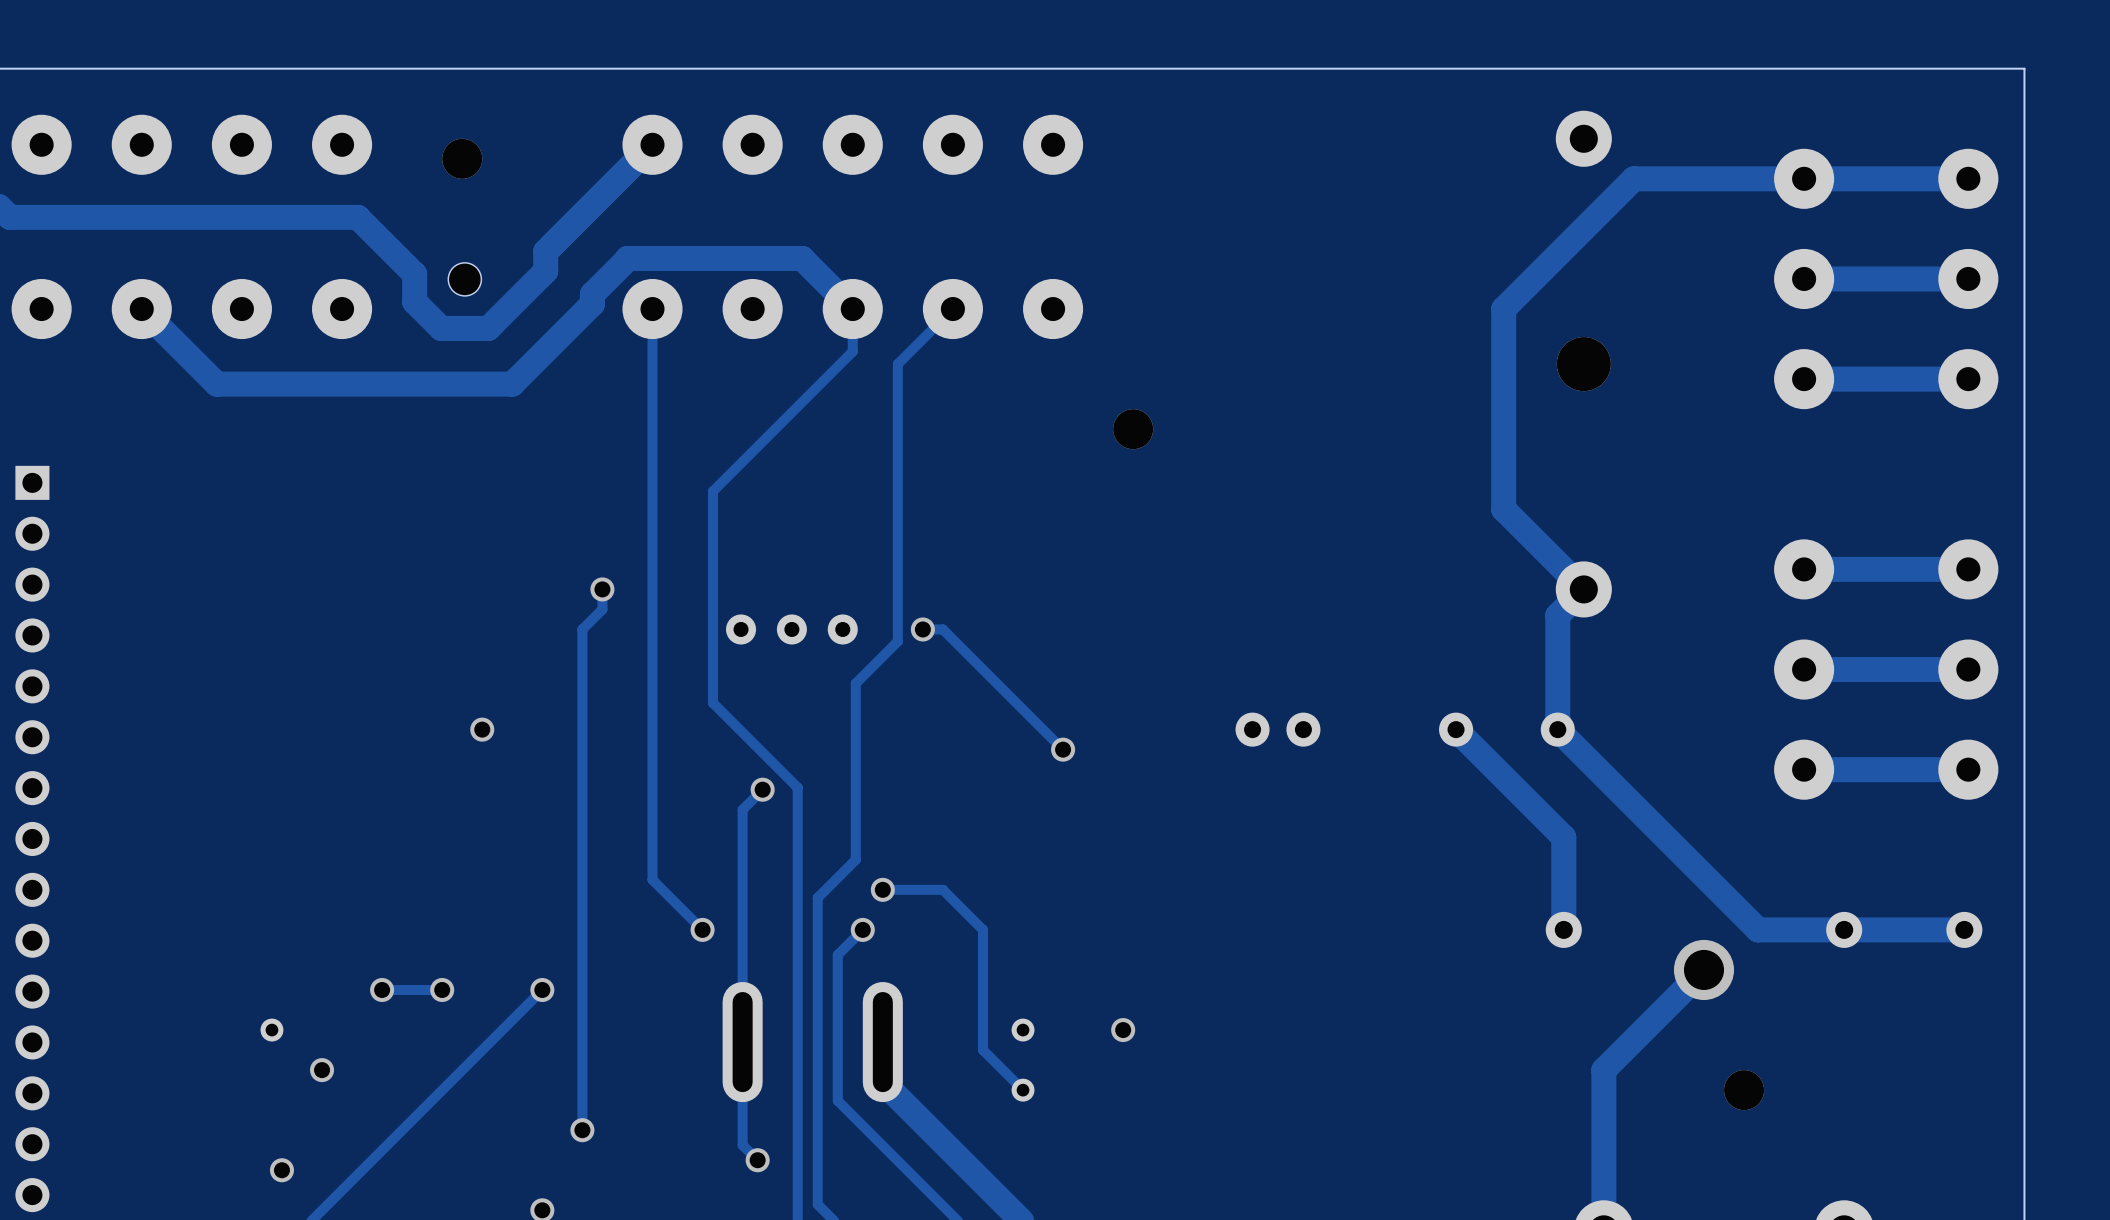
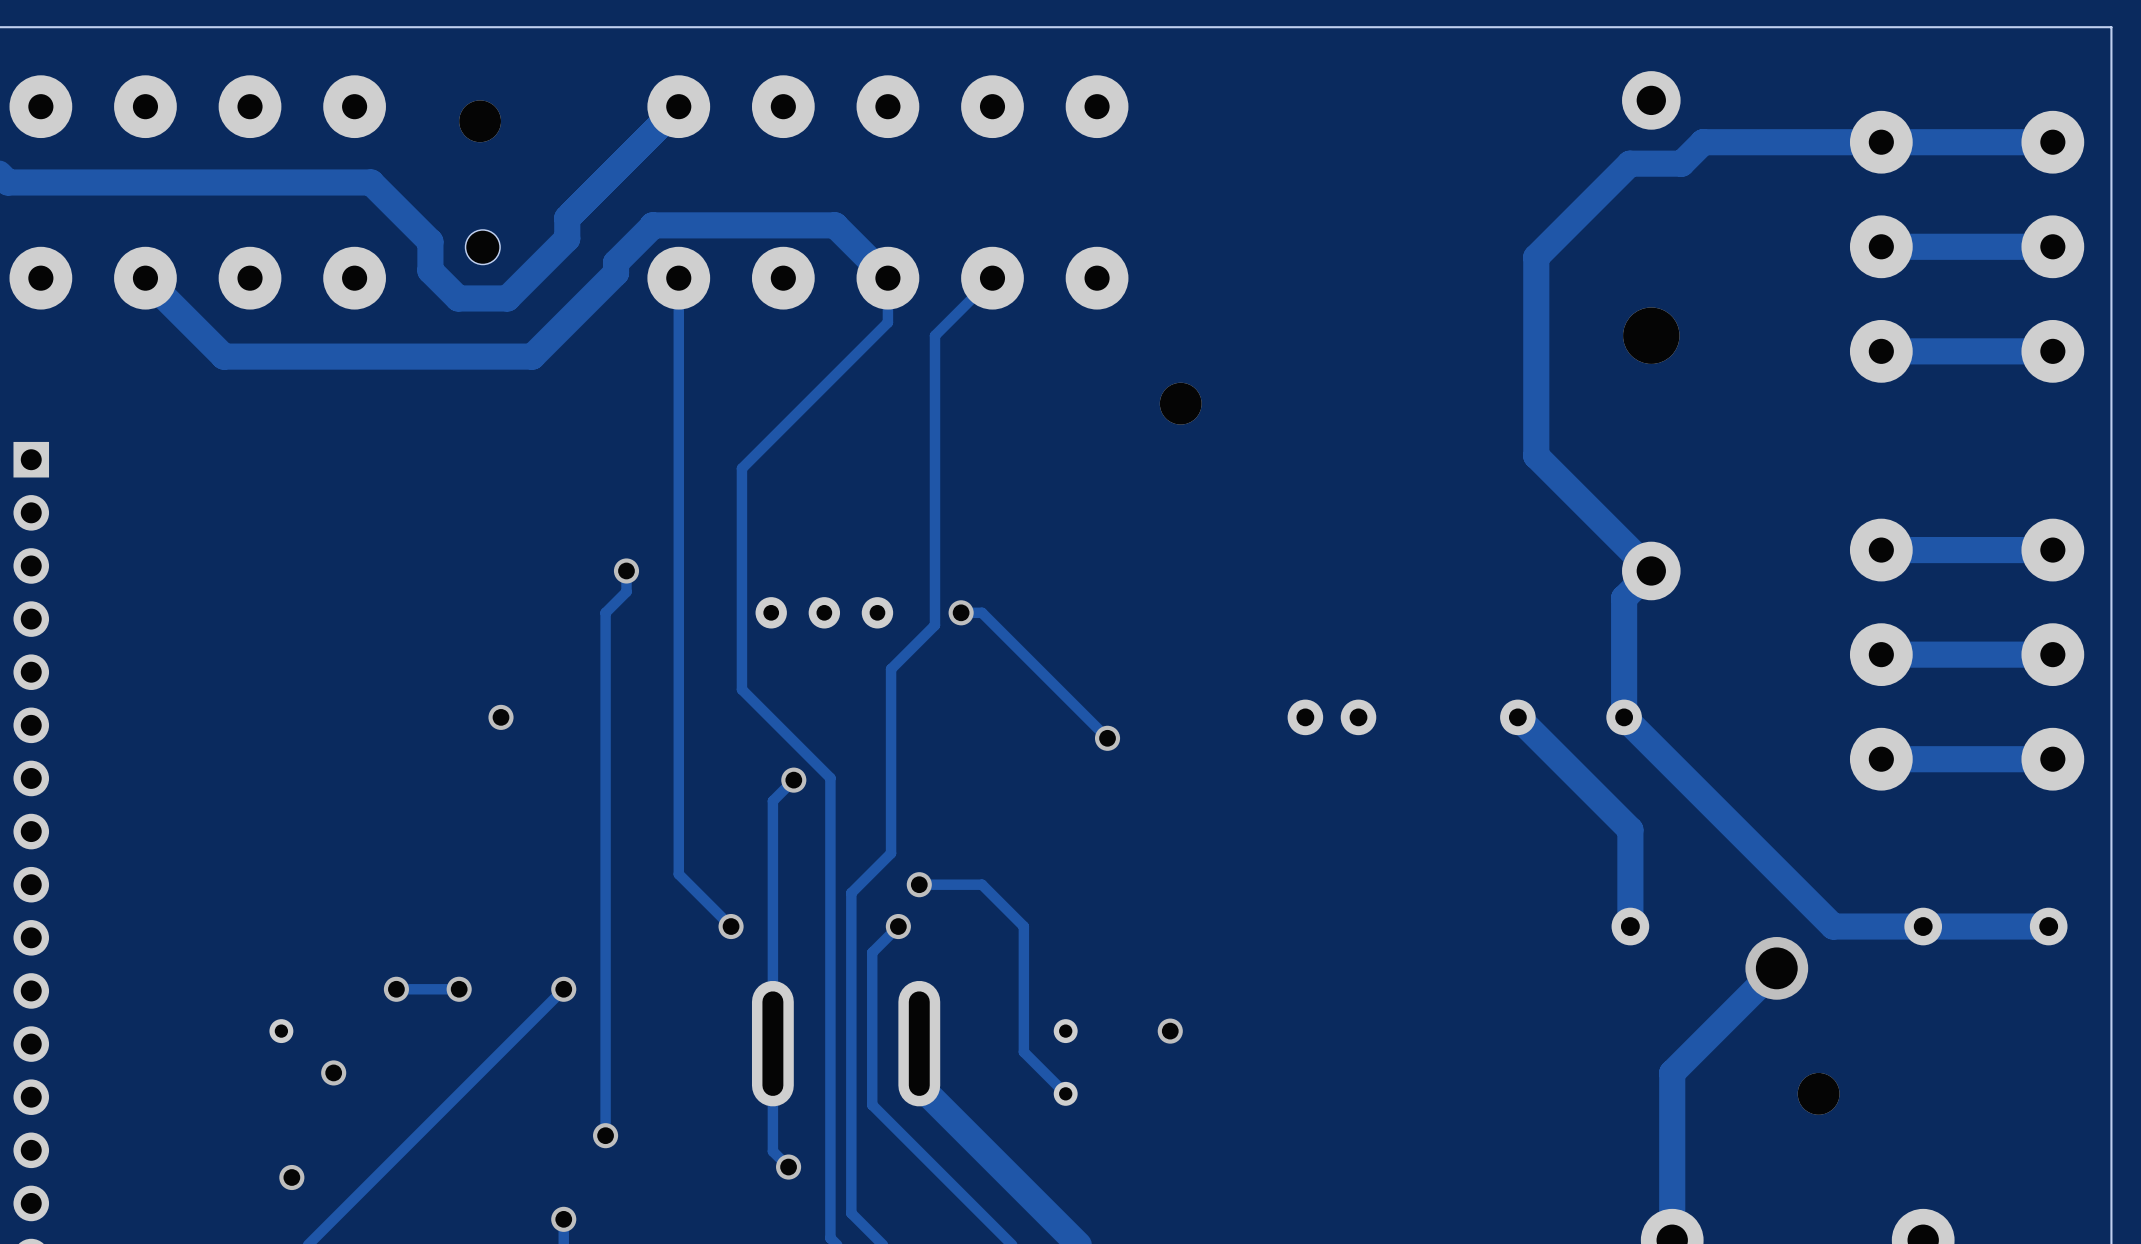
track: (1633, 178) (1503, 309) (1503, 509) -> (1703, 142) (1681, 163) (1629, 163) (1536, 257) (1536, 455) (1567, 487)

